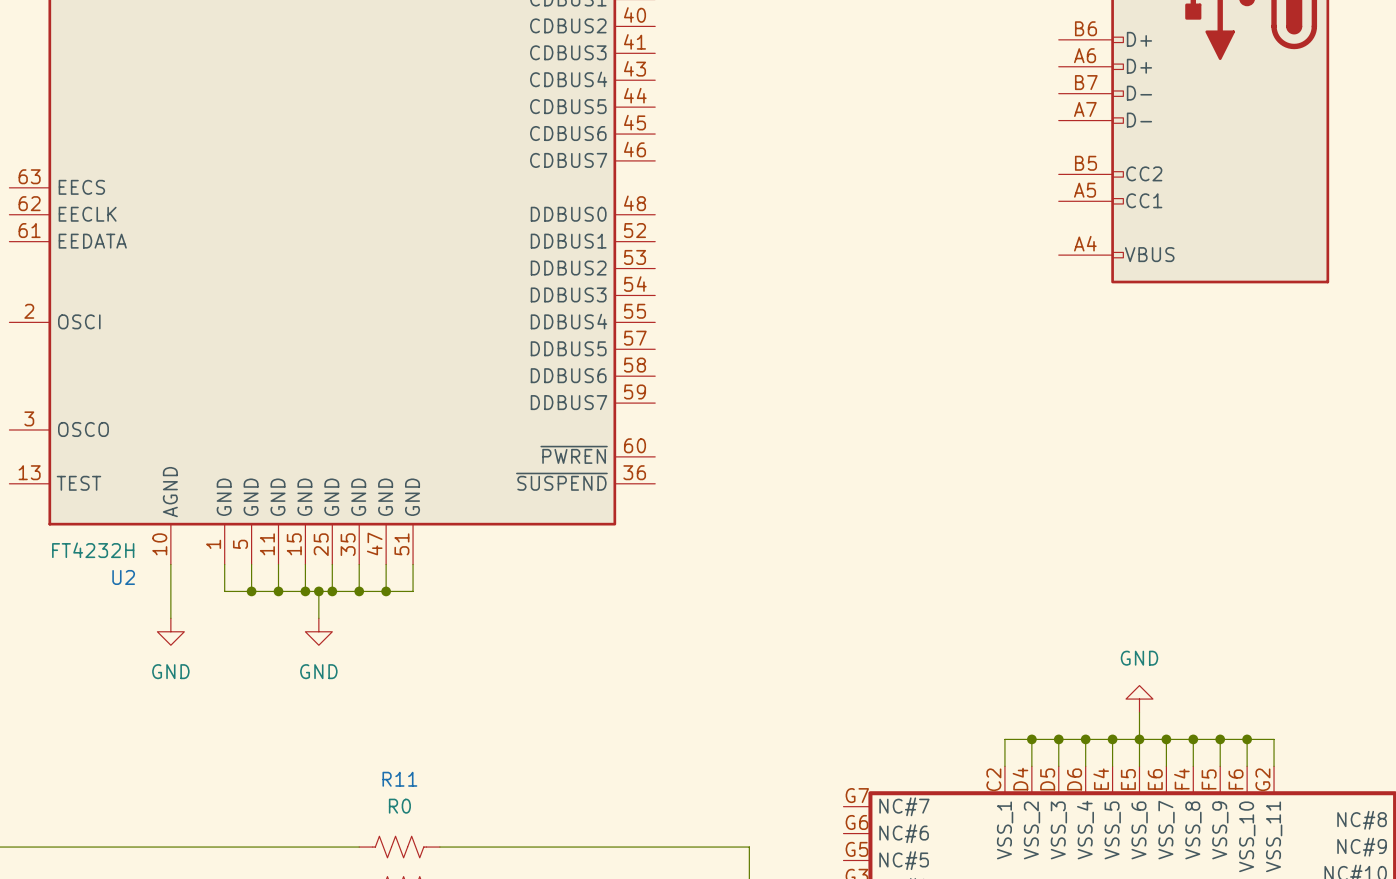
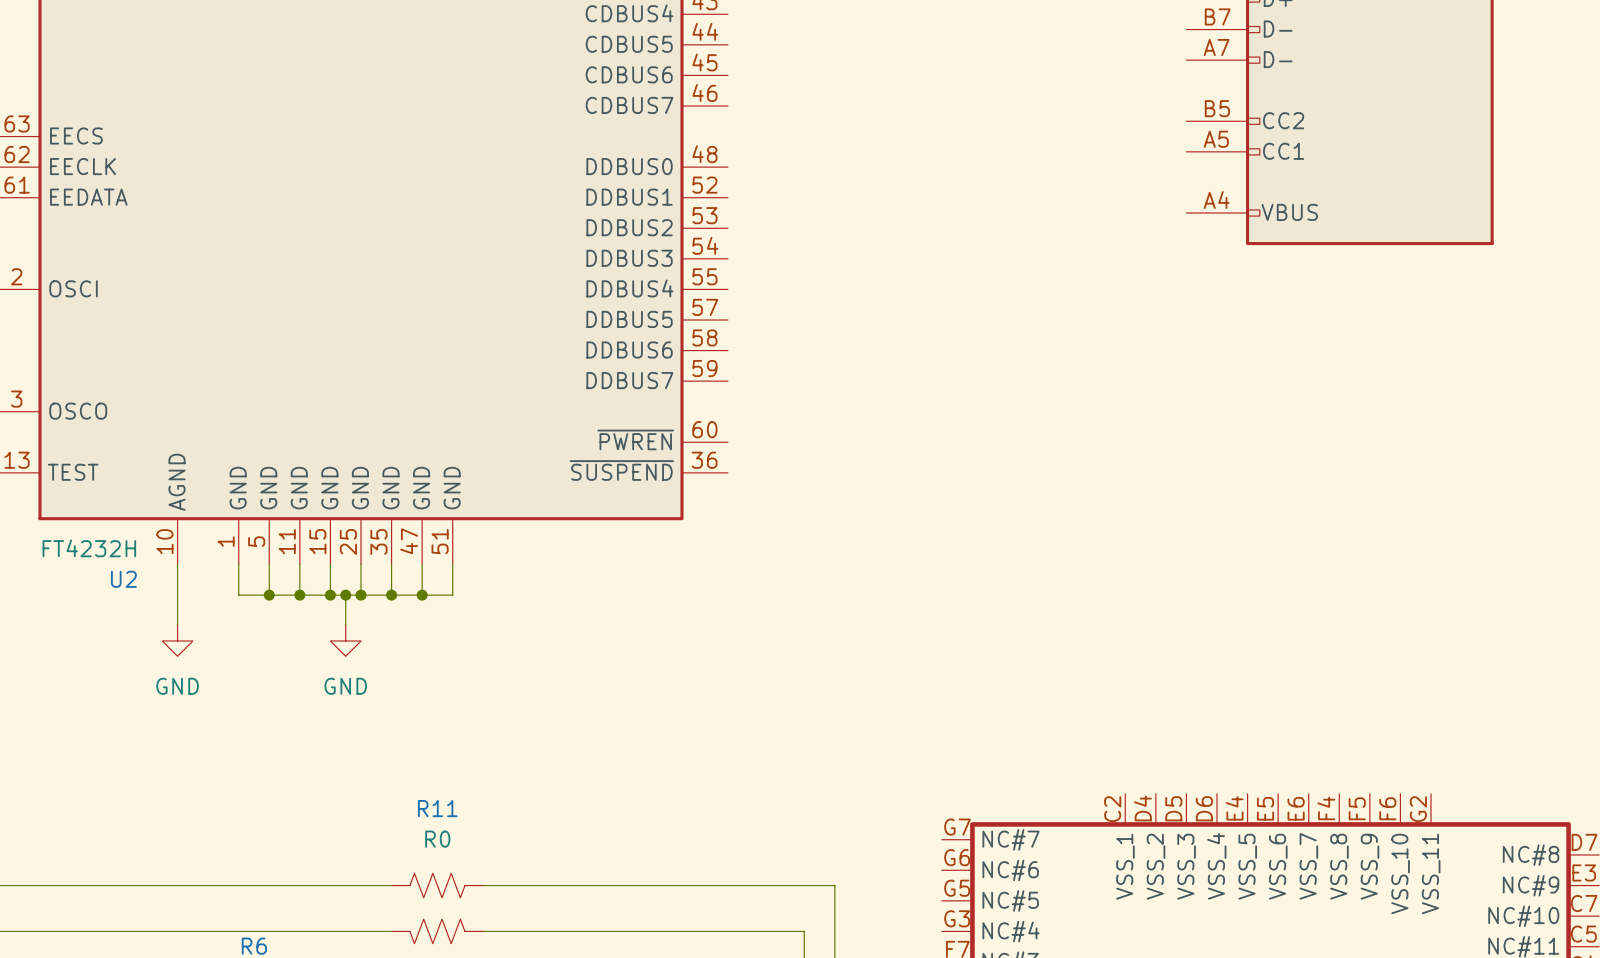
power symbol: GND (1139, 699) -> none
wire: (1139, 712) (1139, 766) -> none
wire: (1031, 739) (1031, 766) -> none
junction: (1031, 739) -> none
wire: (1058, 739) (1058, 766) -> none
junction: (1058, 739) -> none
wire: (1085, 739) (1085, 766) -> none
junction: (1085, 739) -> none
wire: (1112, 739) (1112, 766) -> none
junction: (1112, 739) -> none
junction: (1139, 739) -> none
wire: (1166, 739) (1166, 766) -> none
junction: (1166, 739) -> none
wire: (1193, 739) (1193, 766) -> none
junction: (1193, 739) -> none
wire: (1220, 739) (1220, 766) -> none
junction: (1220, 739) -> none
wire: (1247, 739) (1247, 766) -> none
junction: (1247, 739) -> none
wire: (1004, 766) (1004, 739) (1274, 739) (1274, 766) -> none

